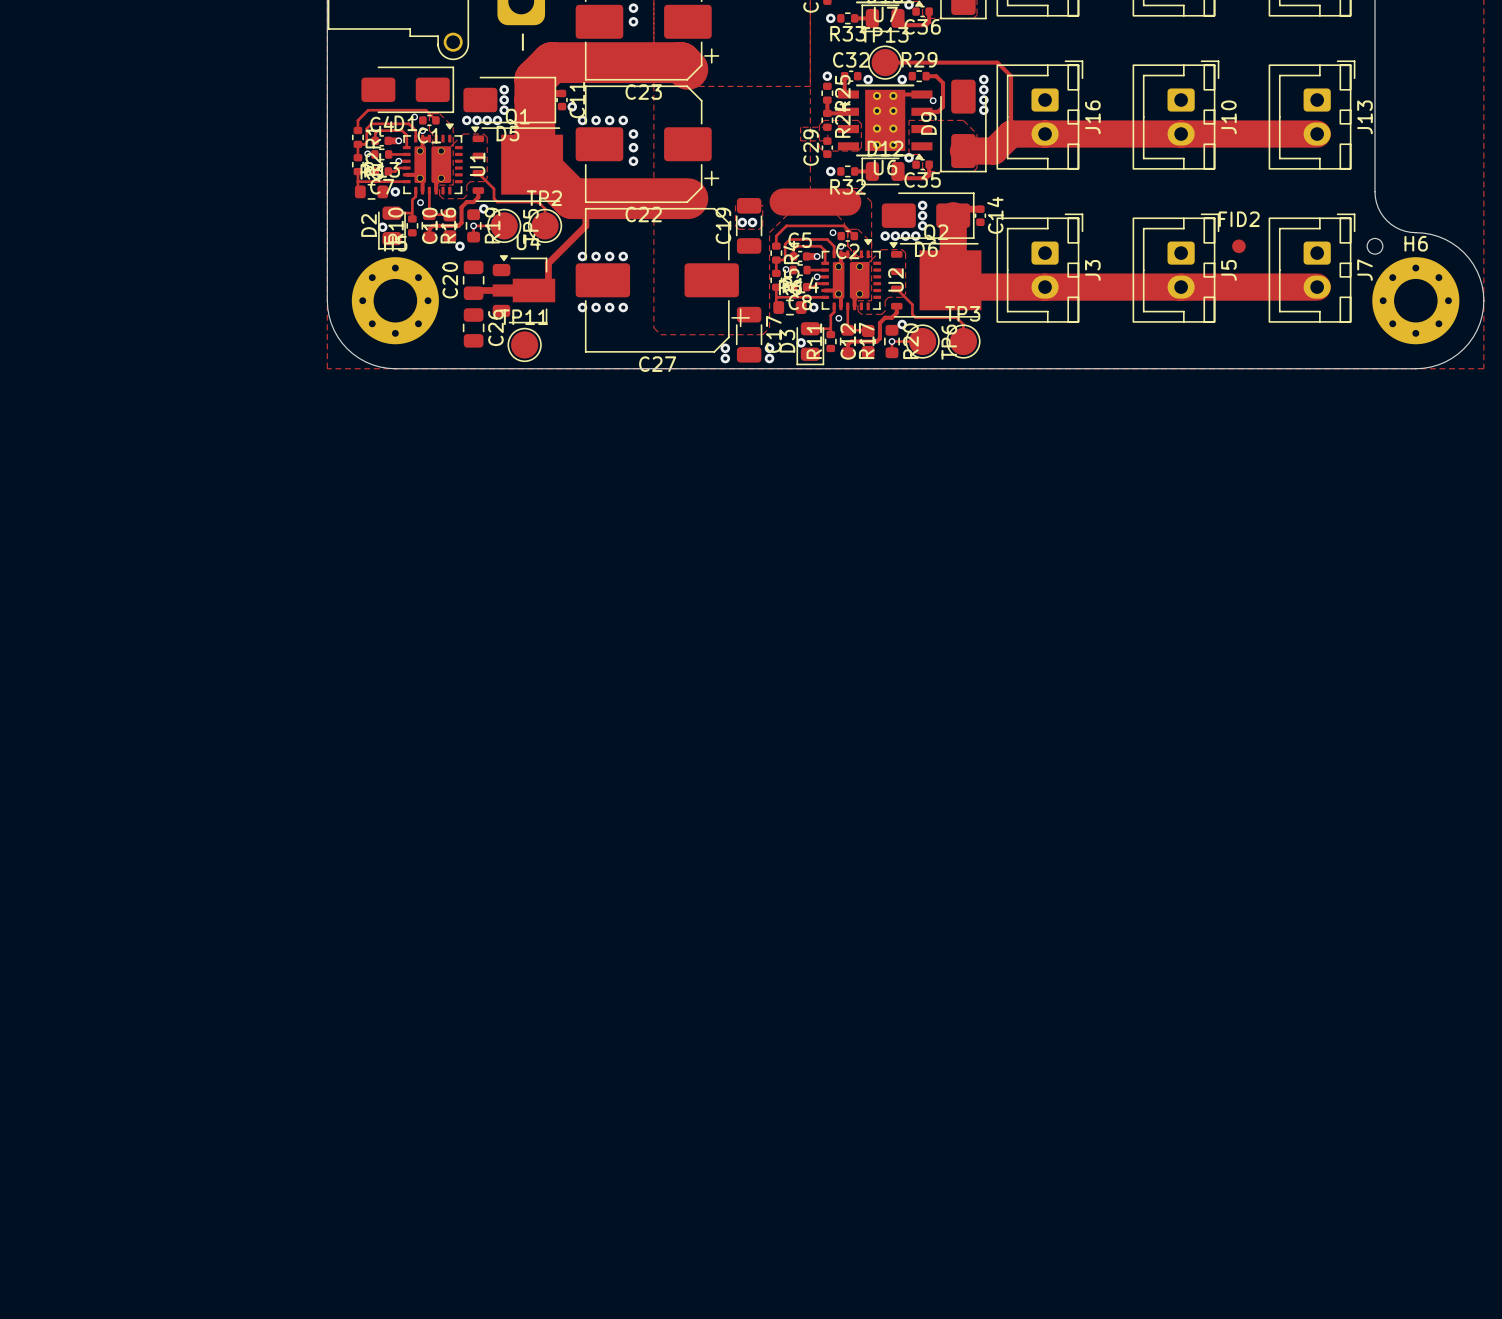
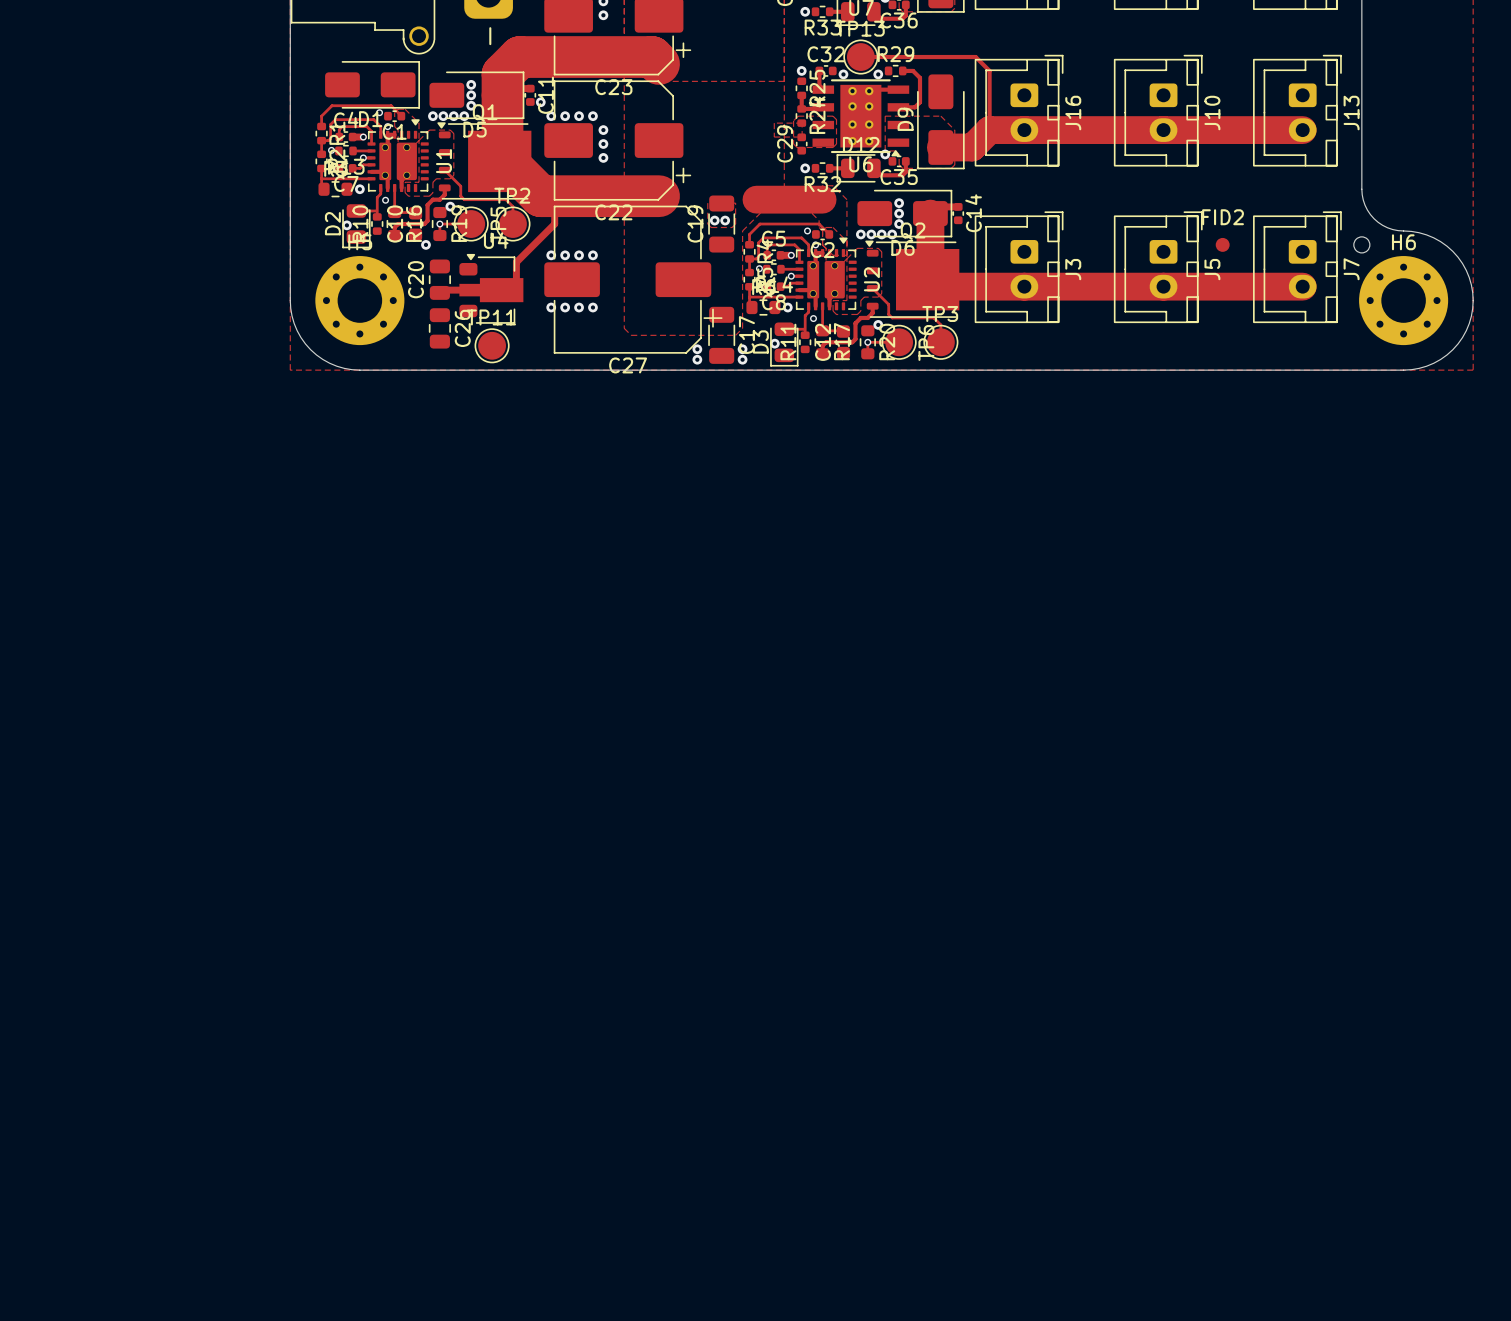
via: (983, 79) -> none
via: (983, 89) -> none
via: (933, 100) -> none
via: (983, 100) -> none
via: (983, 110) -> none

